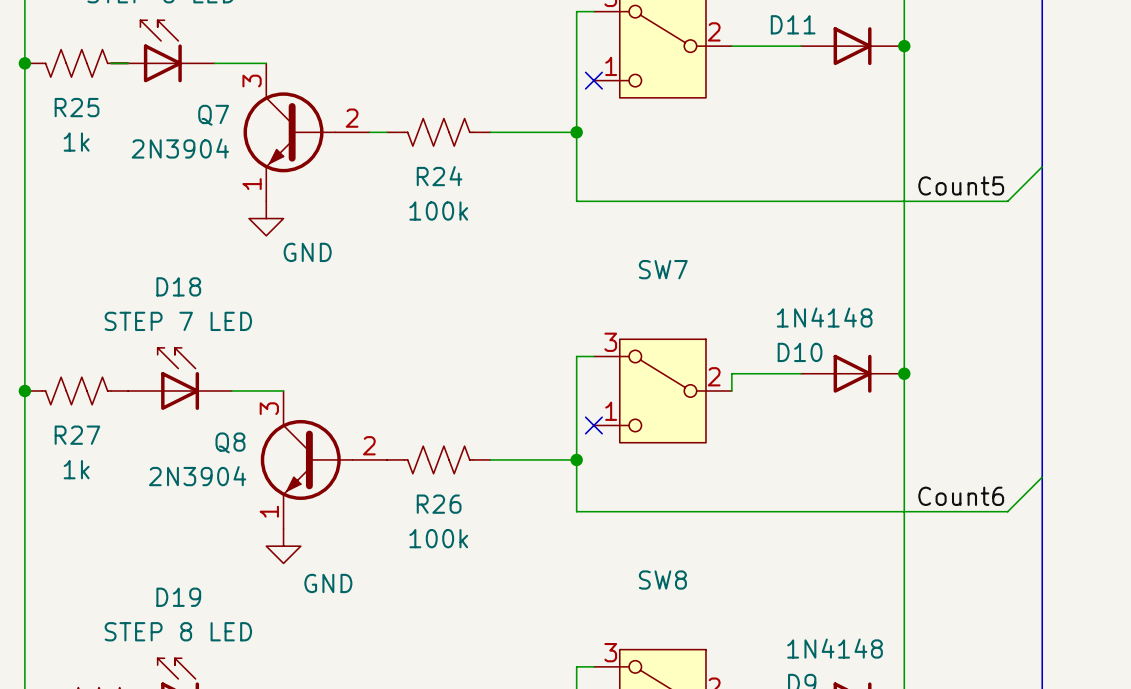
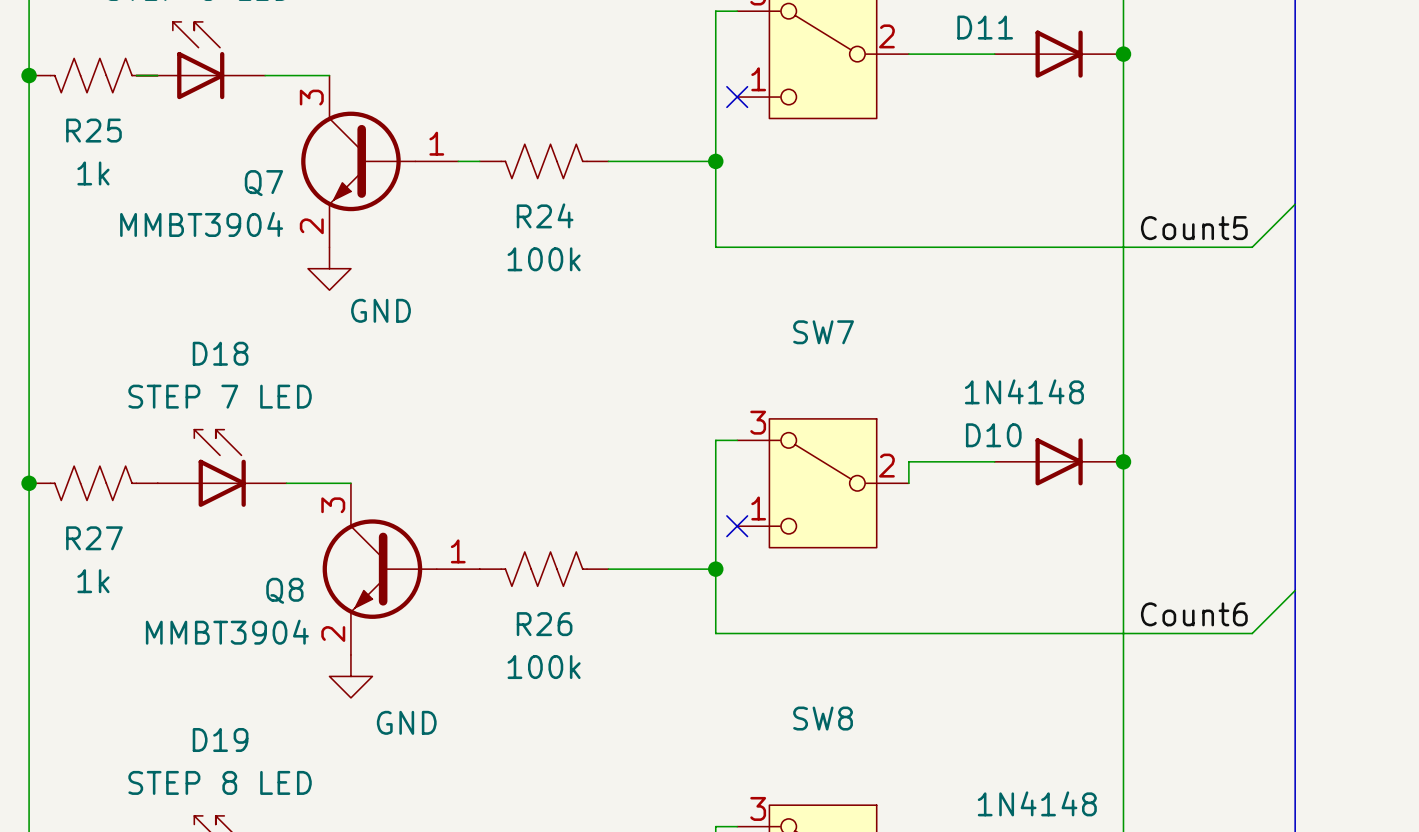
Q7 name position: Q7 (213, 115) -> Q7 (263, 183)
Q7 pin number: 2 (352, 118) -> 1 (436, 143)
Q7 value: 2N3904 (180, 148) -> MMBT3904 (201, 224)
Q7 pin number: 1 (252, 184) -> 2 (311, 226)
Q8 name position: Q8 (230, 442) -> Q8 (284, 590)
Q8 pin number: 2 (369, 445) -> 1 (458, 551)
Q8 value: 2N3904 (197, 476) -> MMBT3904 (227, 632)
Q8 pin number: 1 (269, 511) -> 2 (333, 634)

